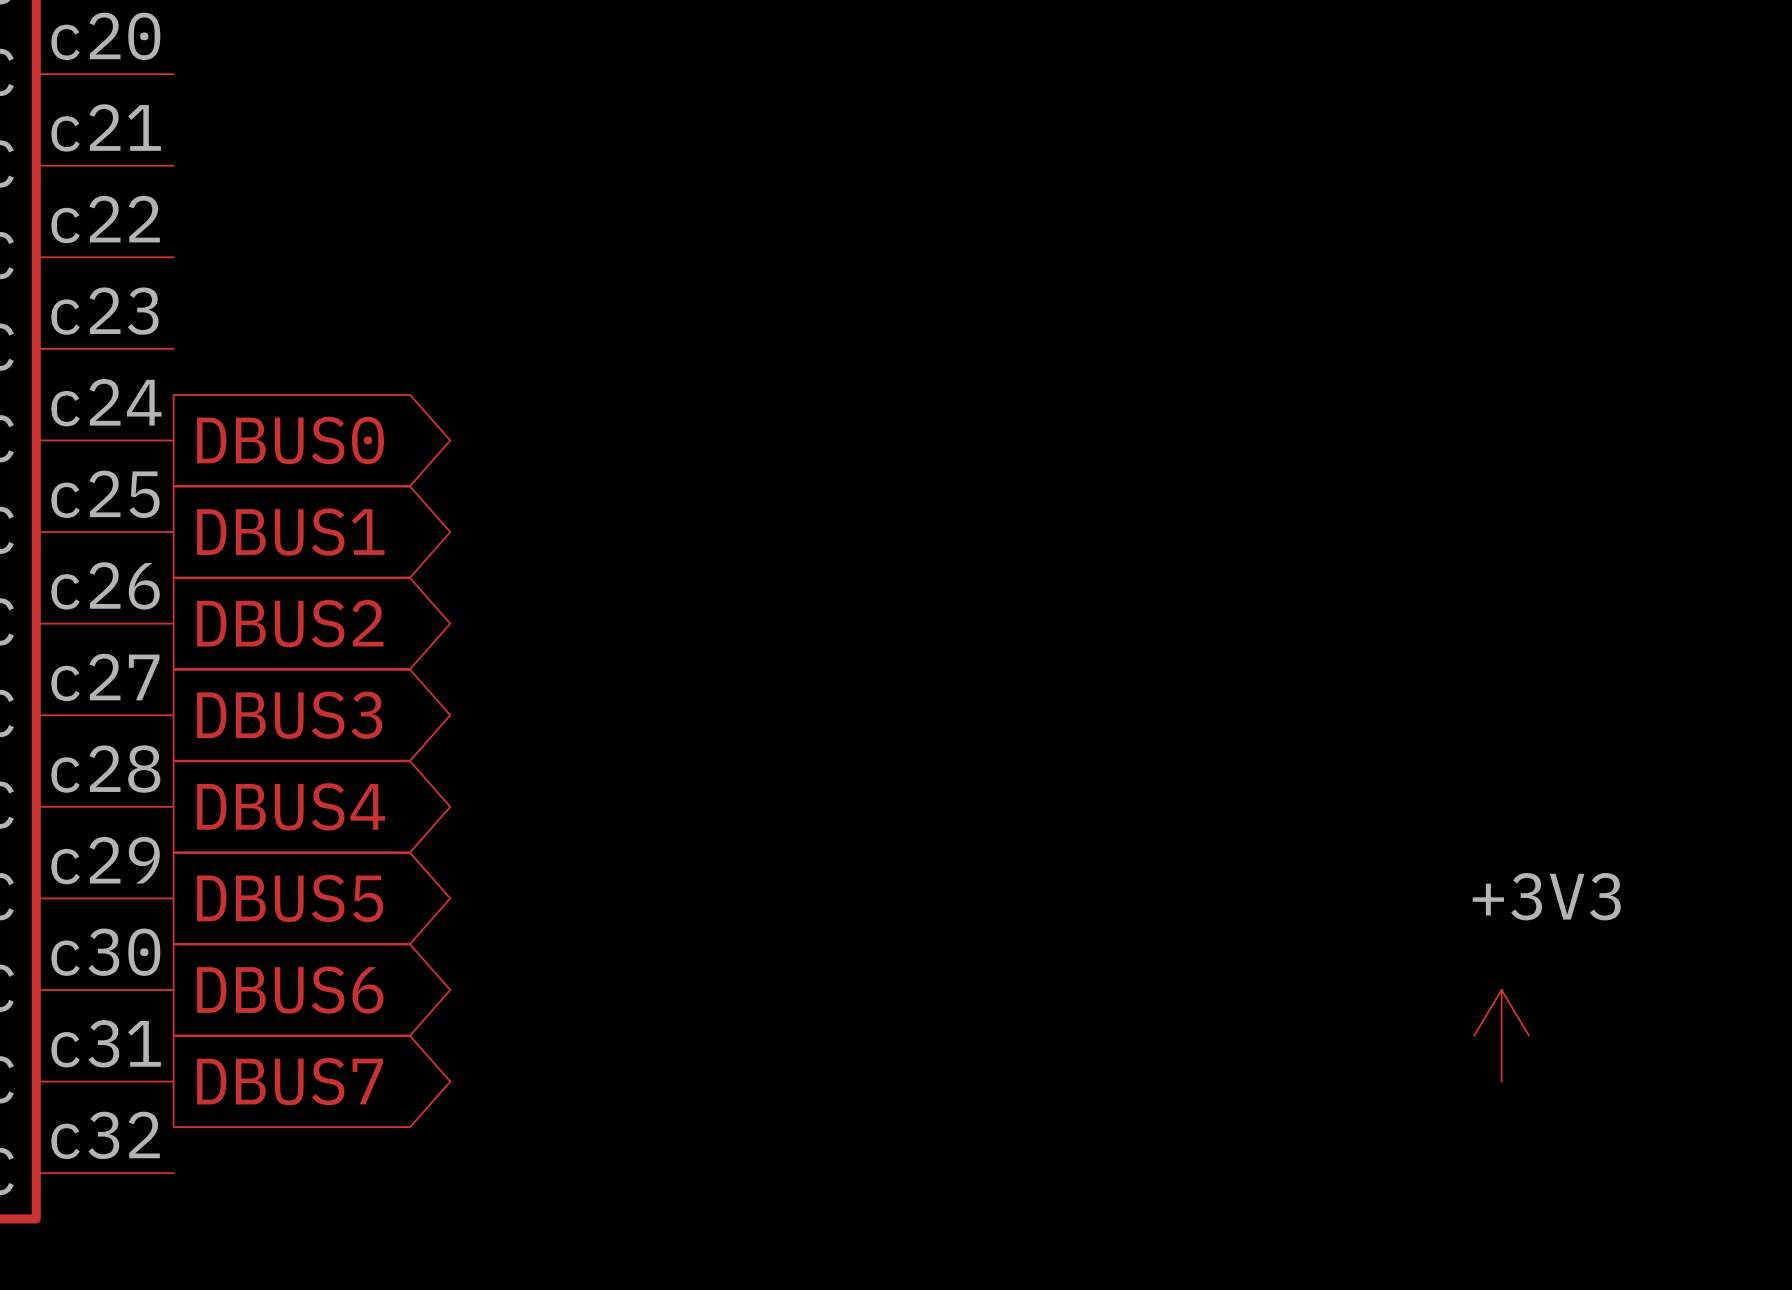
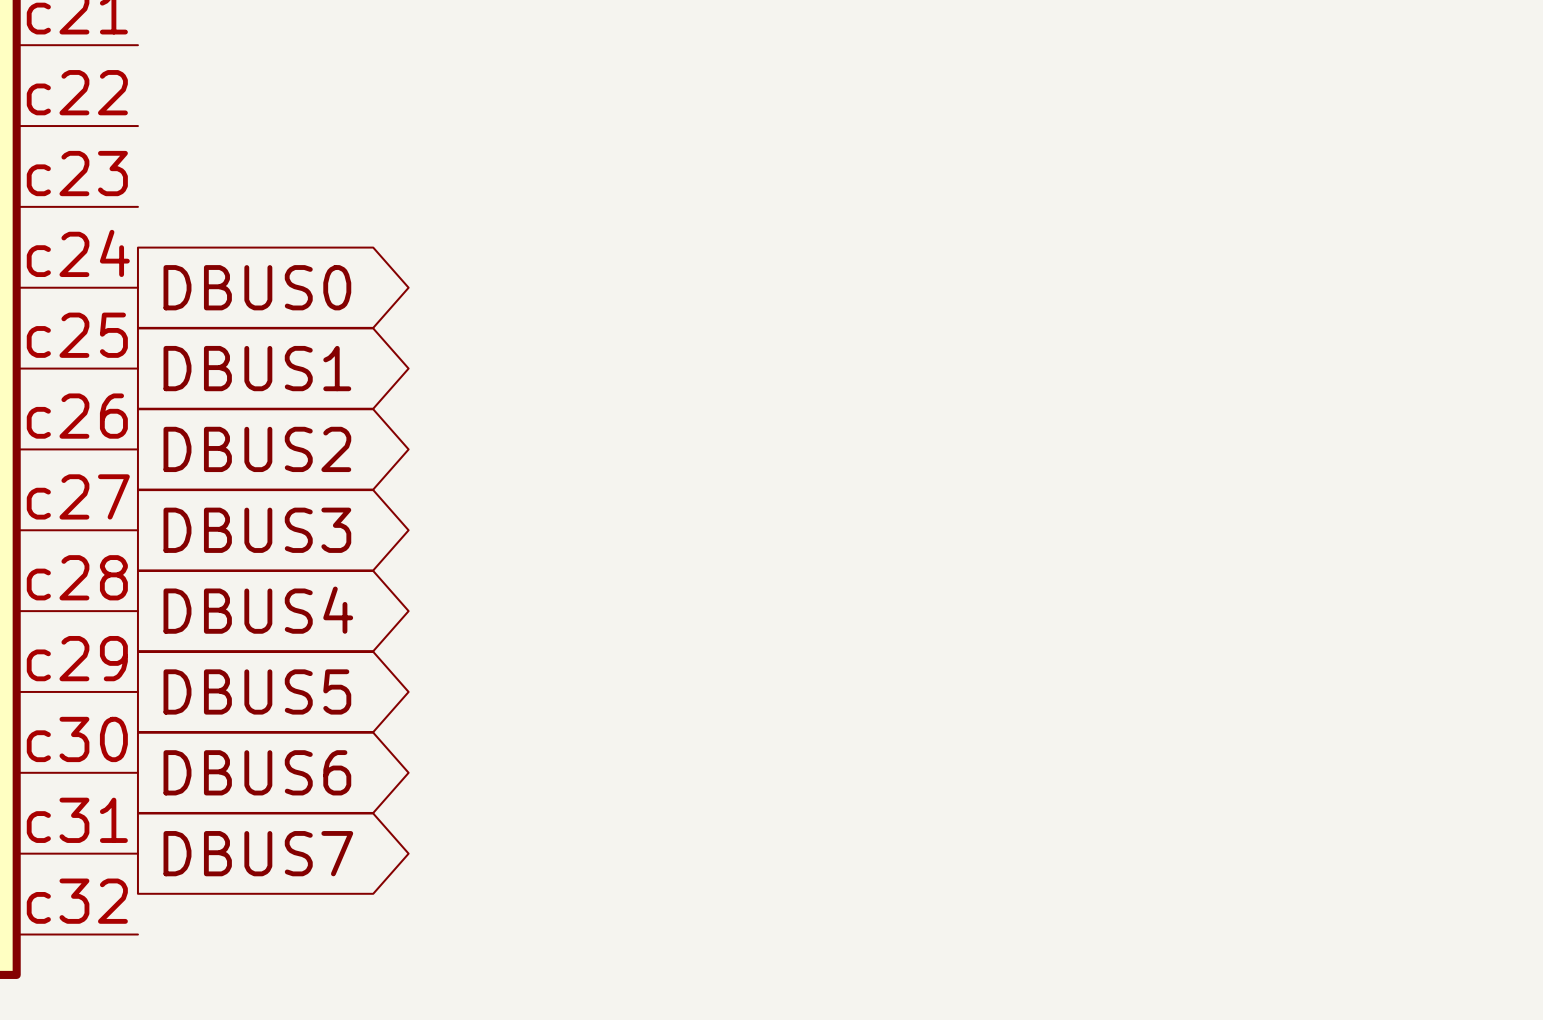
power symbol: +3V3 (1501, 1035) -> none

